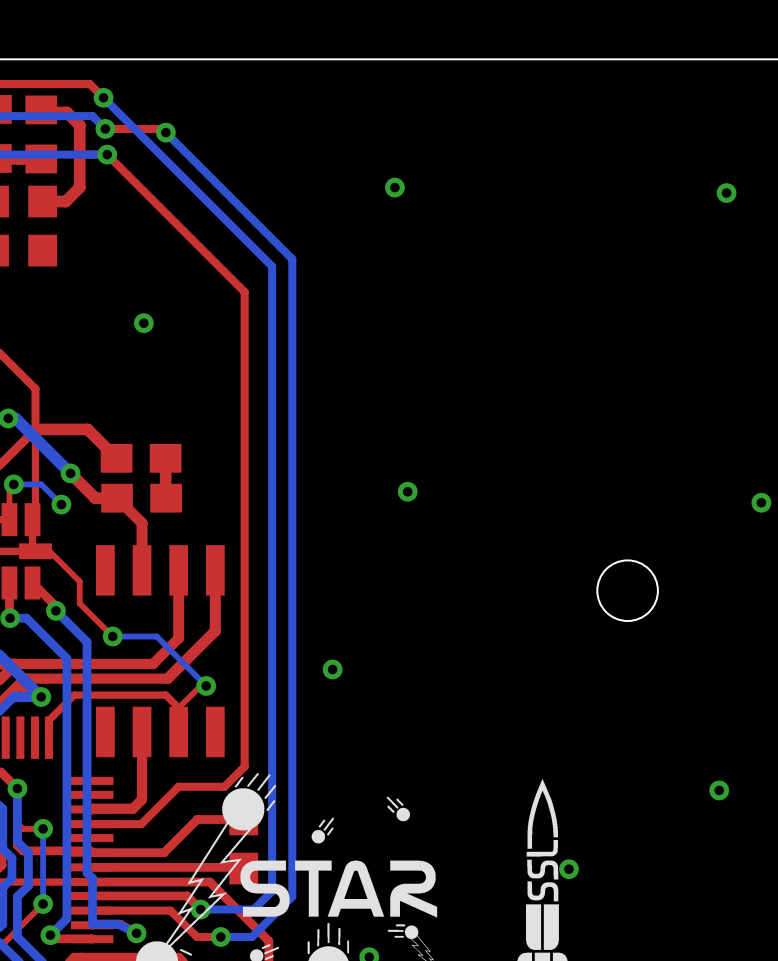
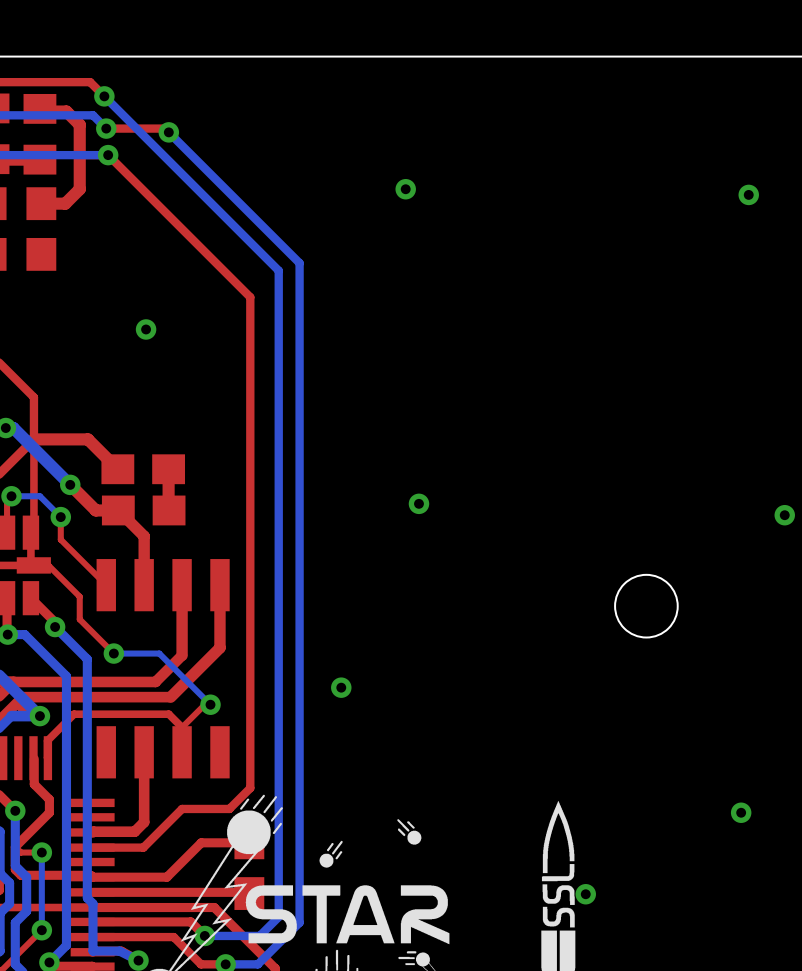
top track: none -> (60, 517) (60, 539) (106, 585)
top track: none -> (34, 758) (34, 784) (49, 799) (49, 812) (15, 846)

